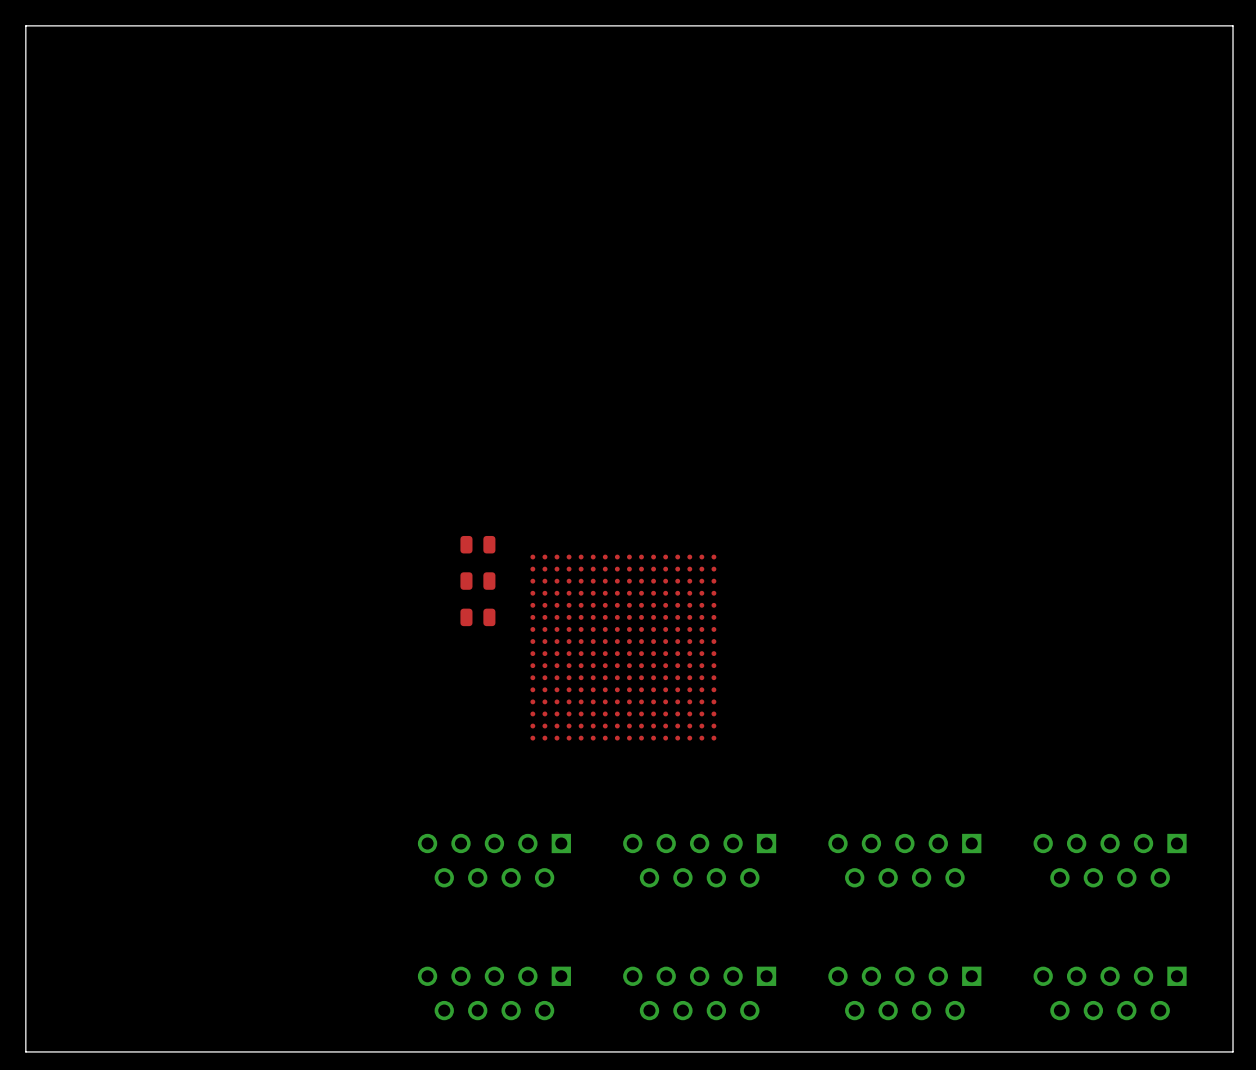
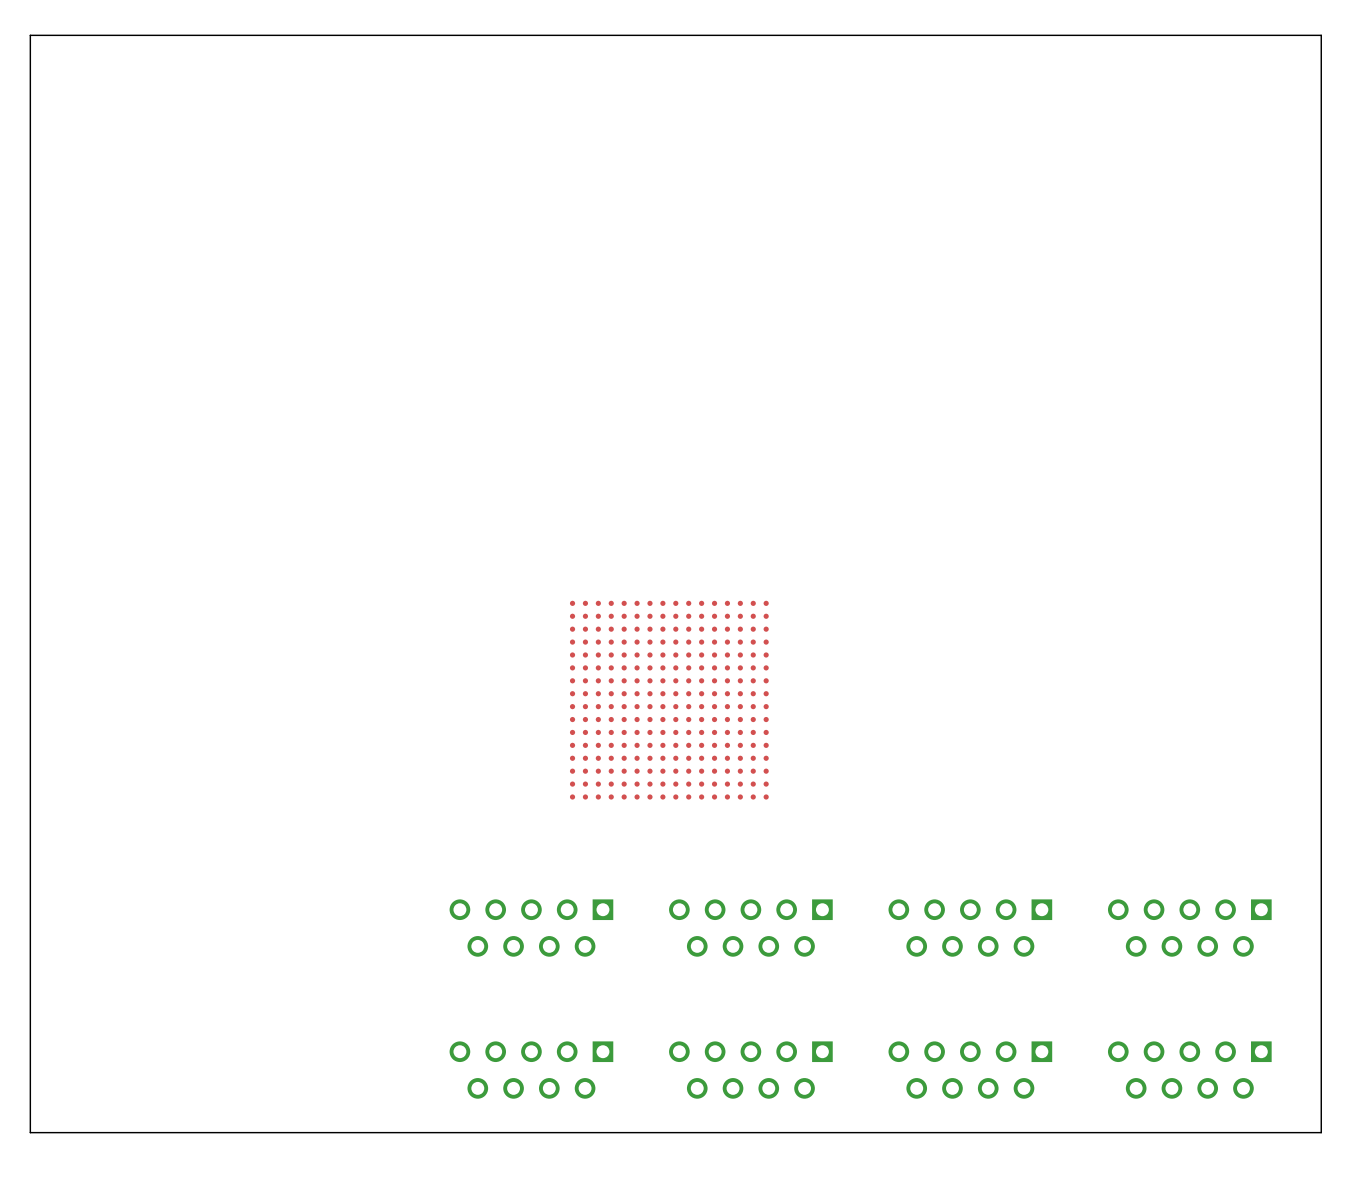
part: (477, 544) -> none
part: (477, 581) -> none
part: (477, 617) -> none

